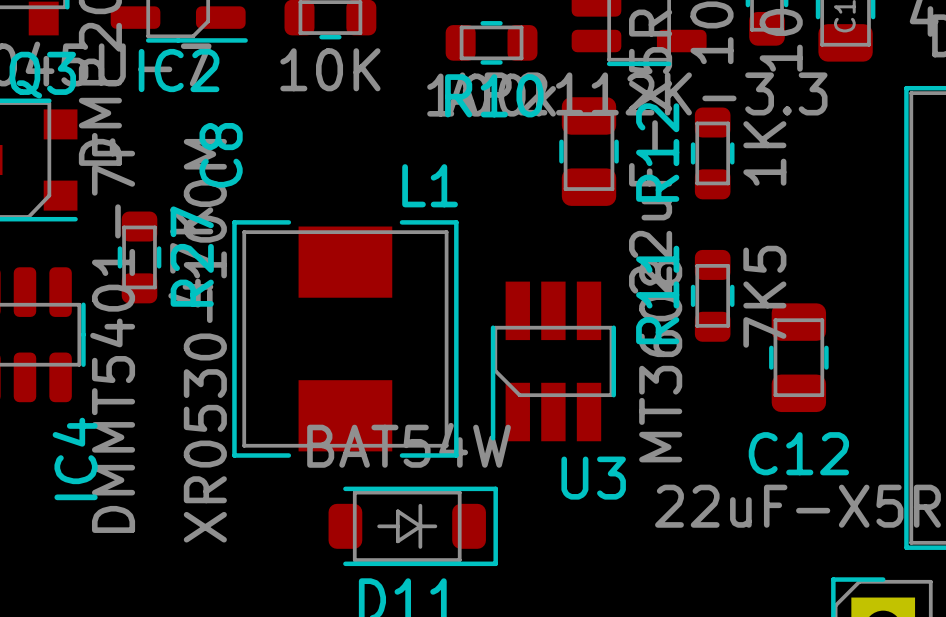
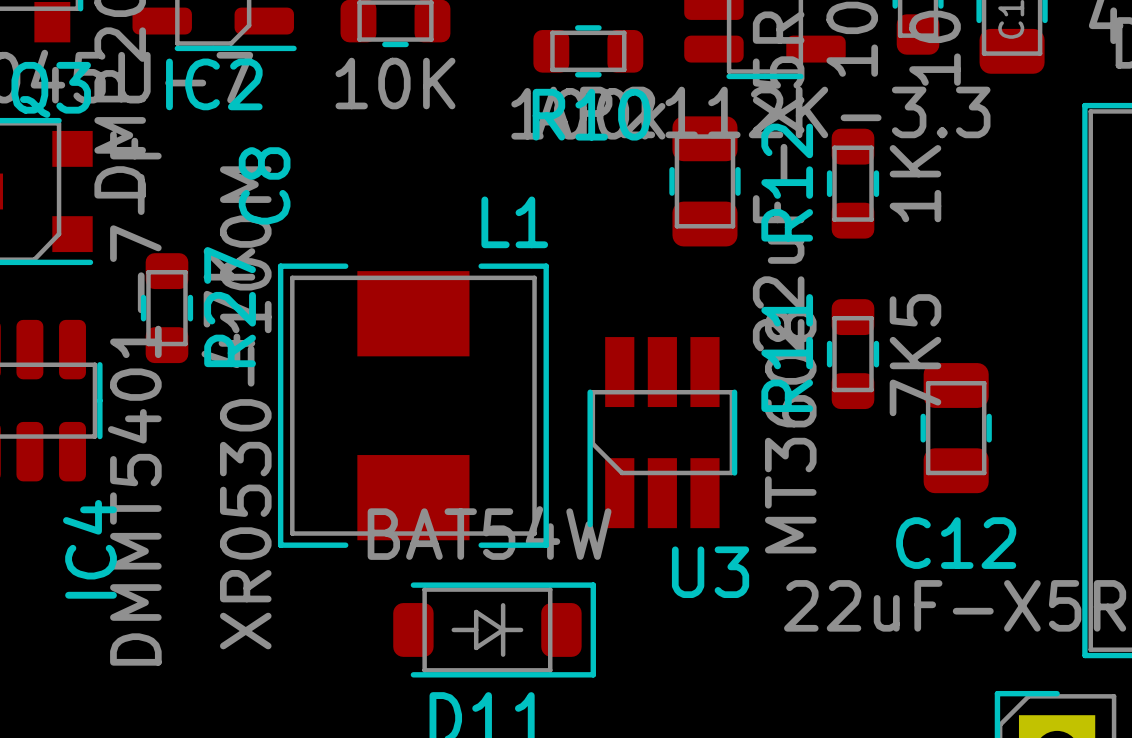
IC4 value: DMMT5401-7F (112, 332) -> DMMT5401-7-F (134, 398)

